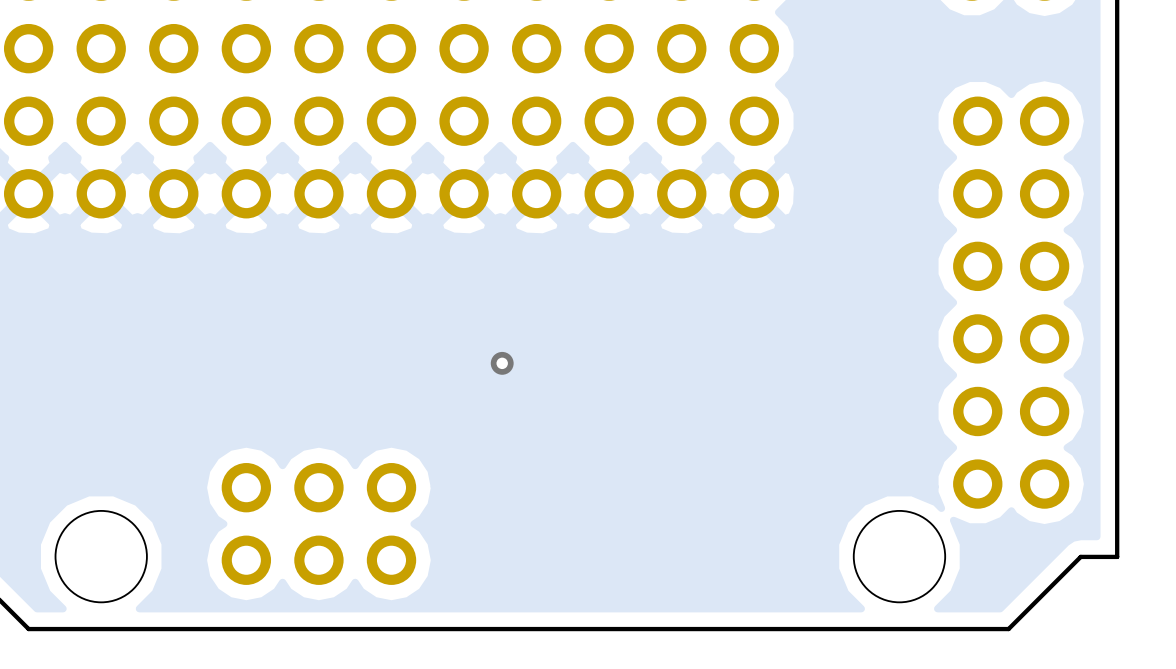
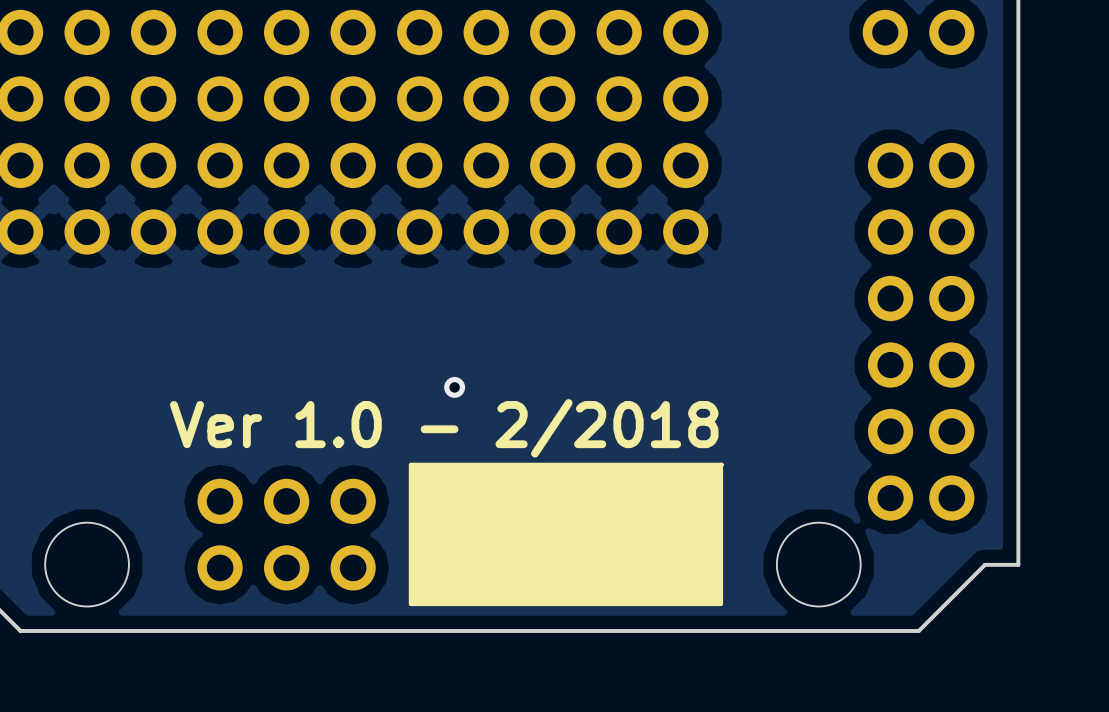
text: none -> Ver 1.0 - 2/2018 (444, 428)
drawing: none -> [408, 462, 724, 607]

